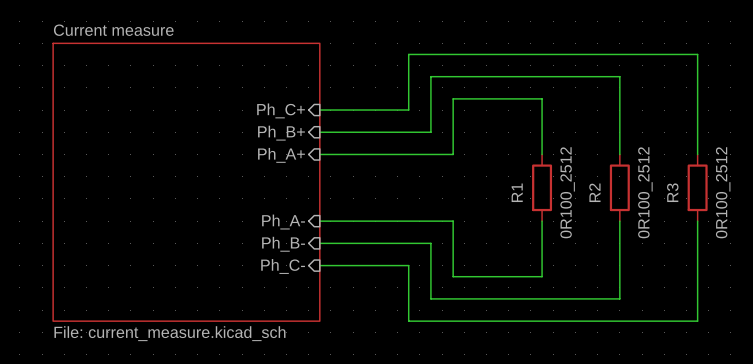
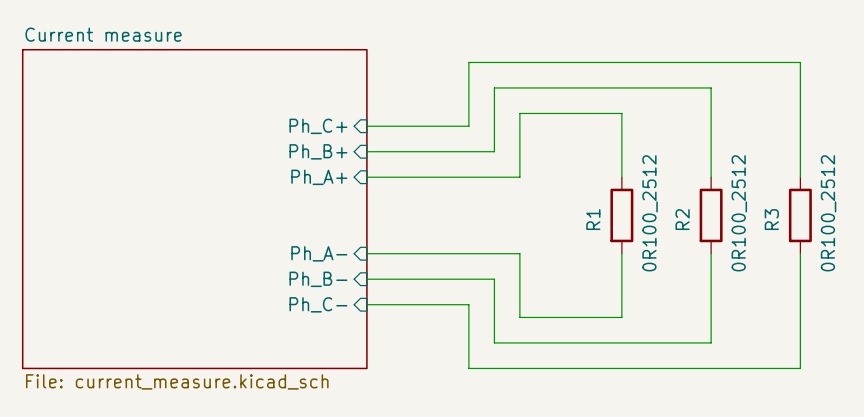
sheet Current measure: none -> File: current_measure.kicad_sch (194, 209)
sheet Current measure: File: current_measure.kicad_sch (186, 182) -> none

